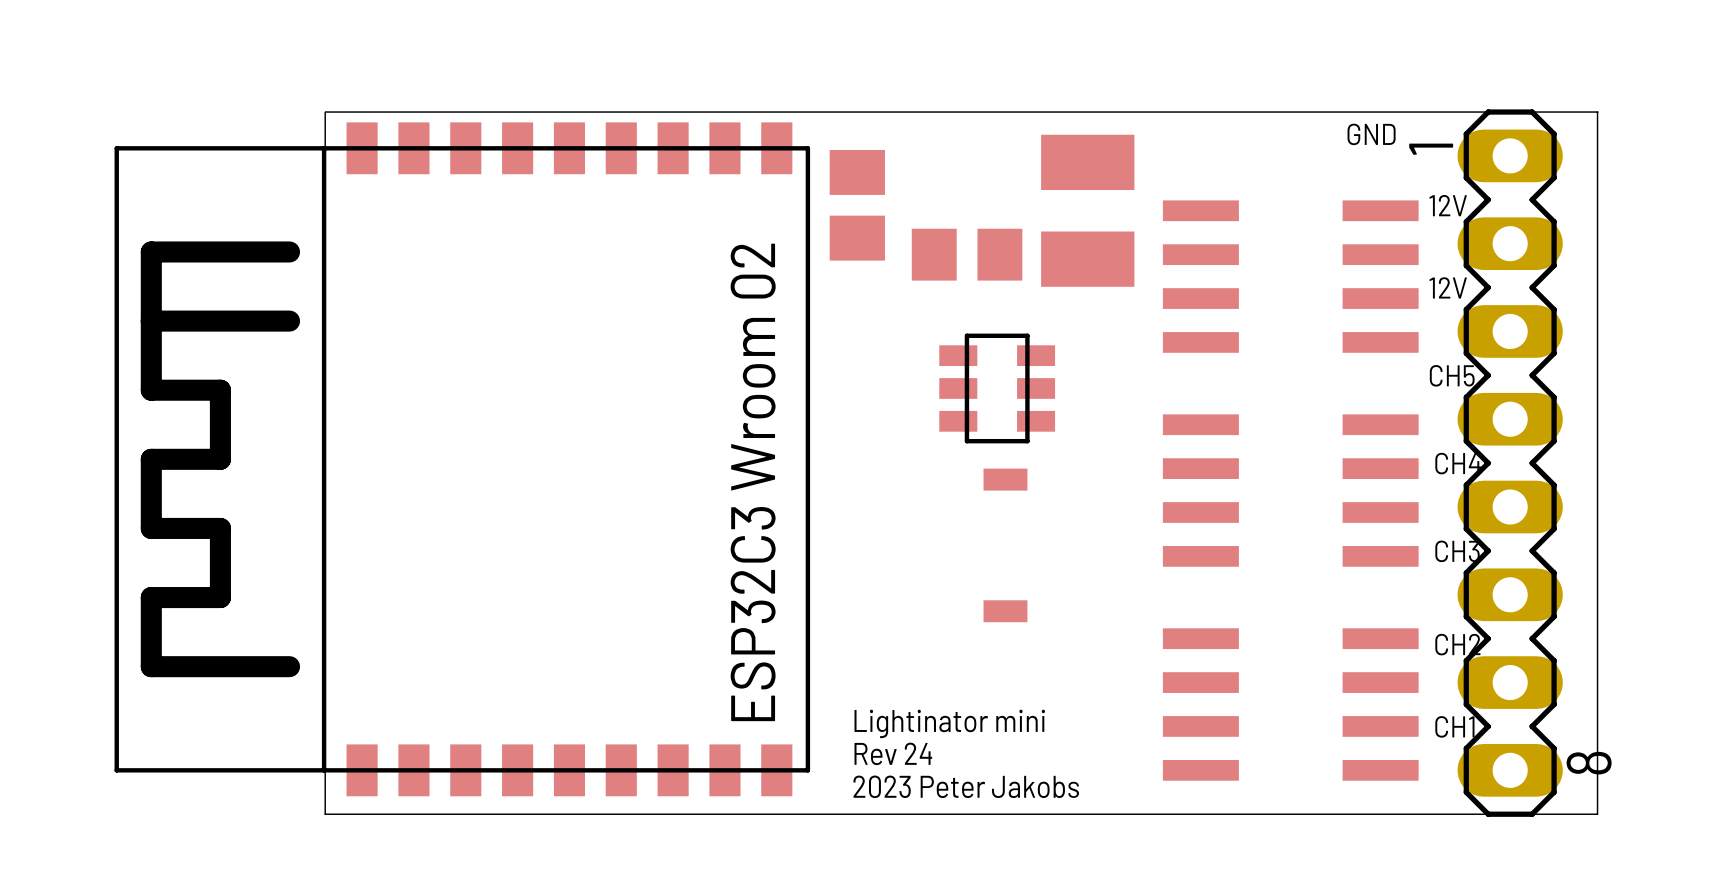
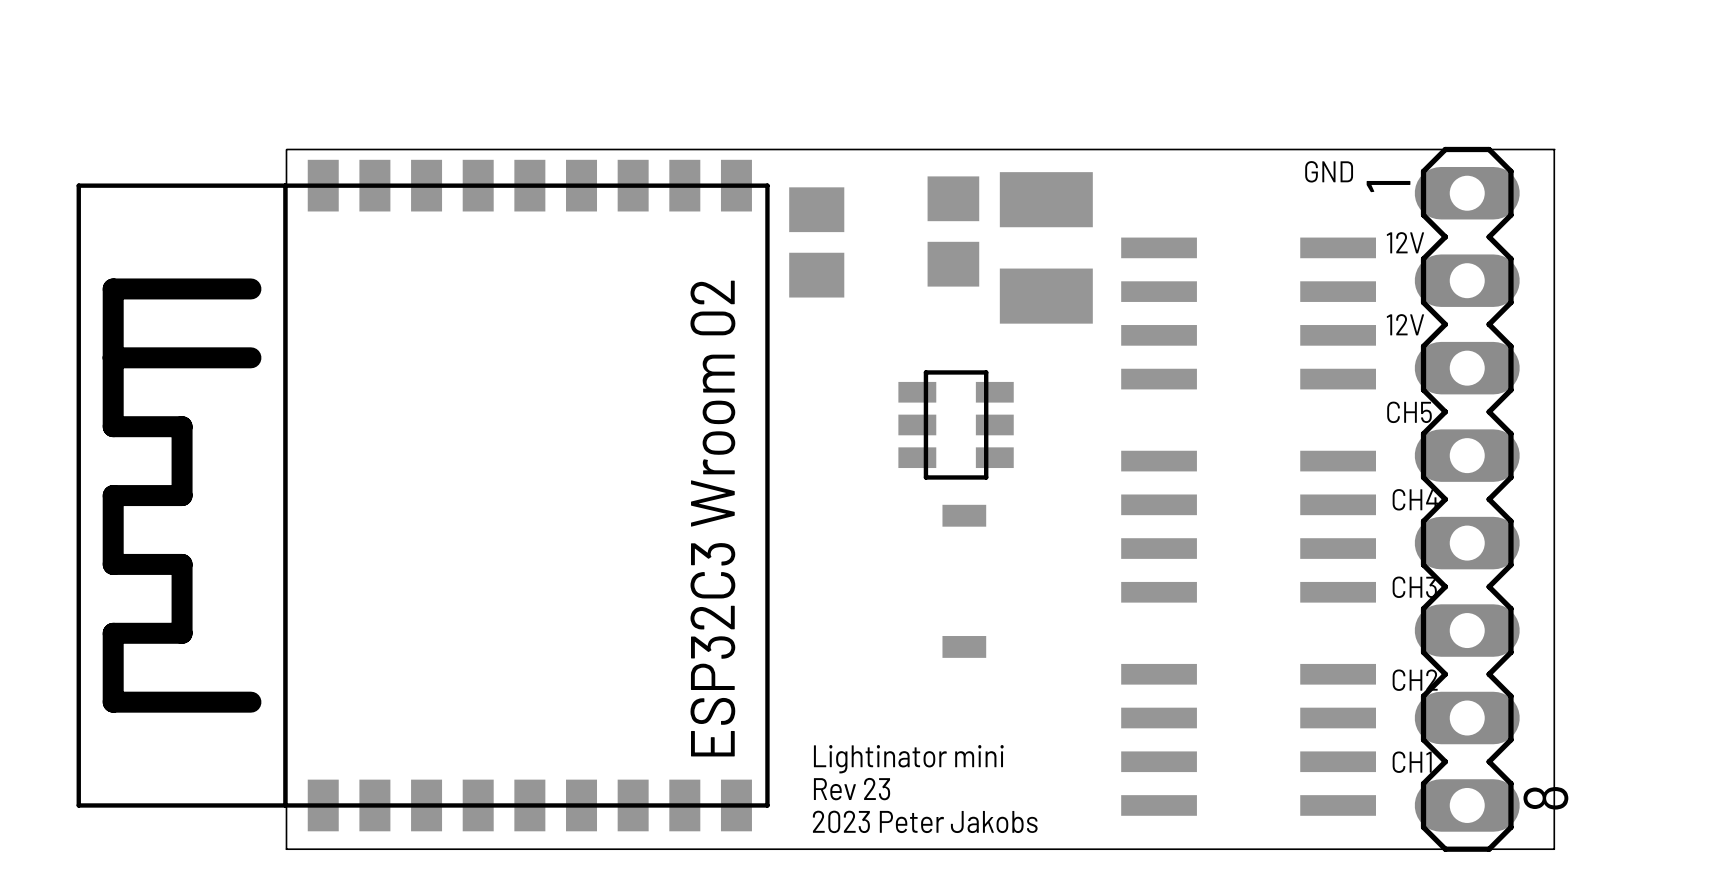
part rotation: 0° (967, 254) -> 90° clockwise (953, 231)
text: Rev 24 (893, 753) -> Rev 23 (852, 789)

